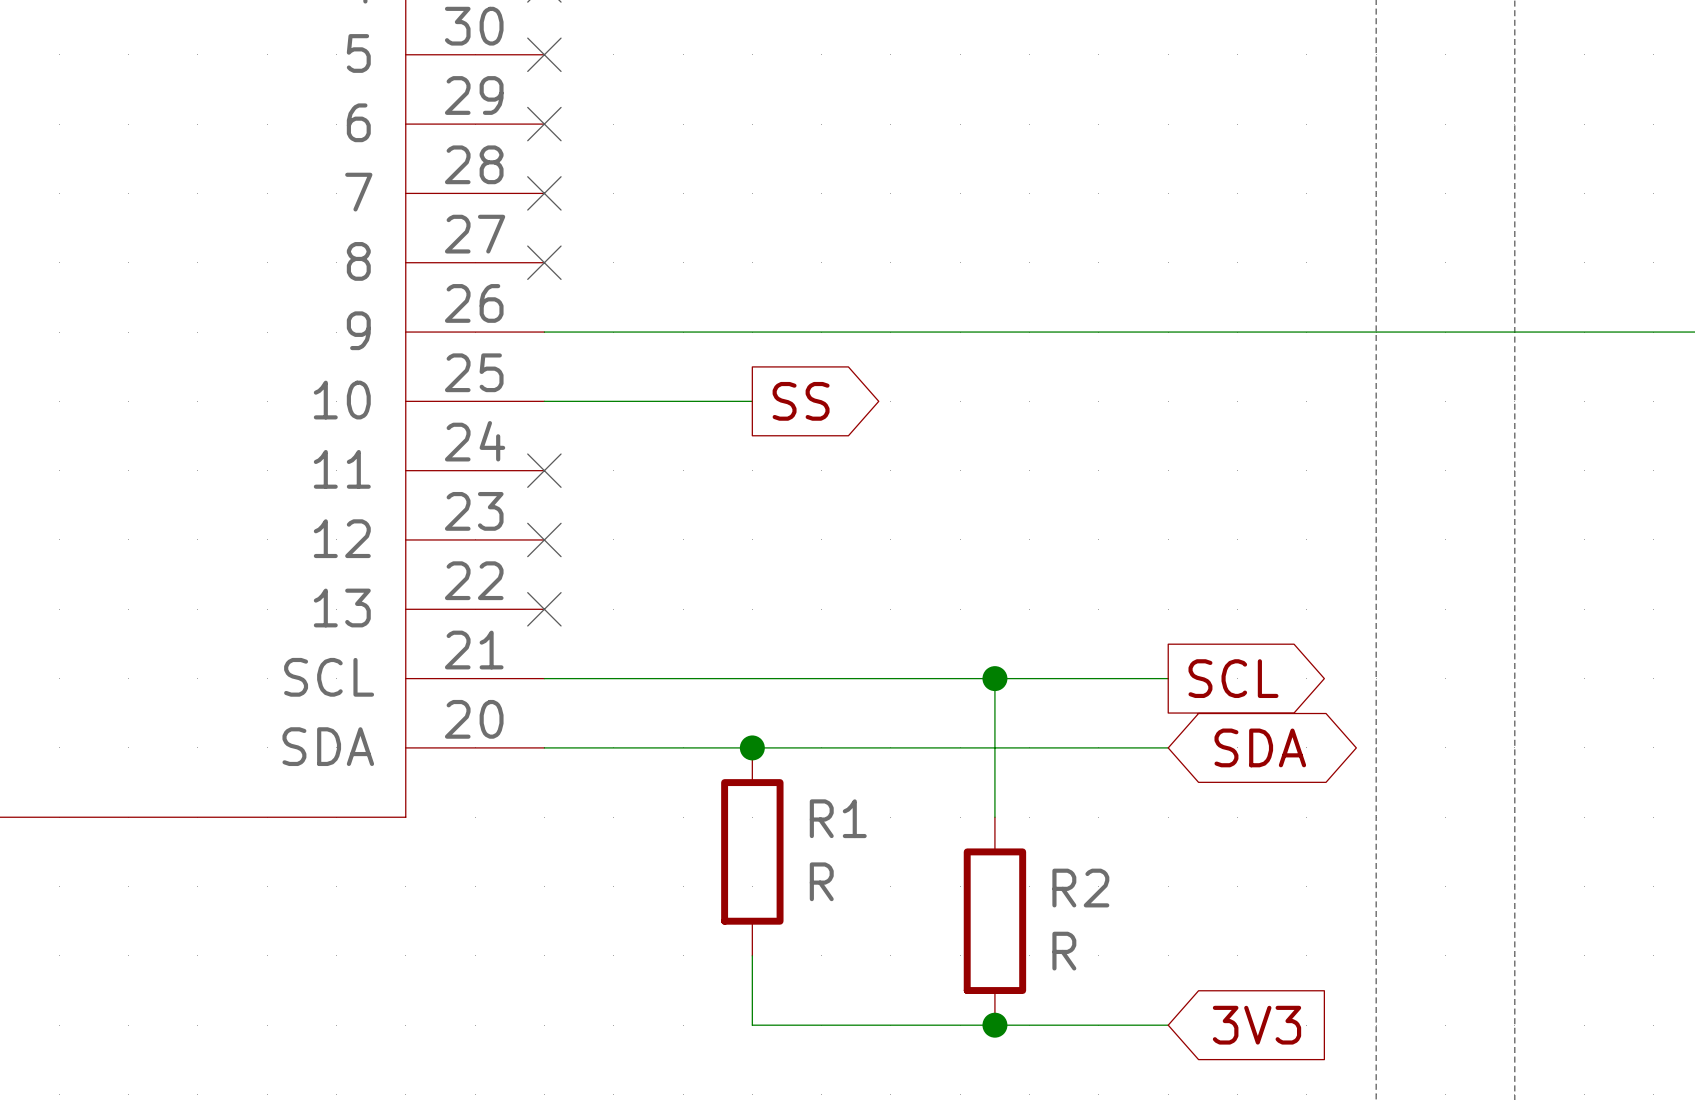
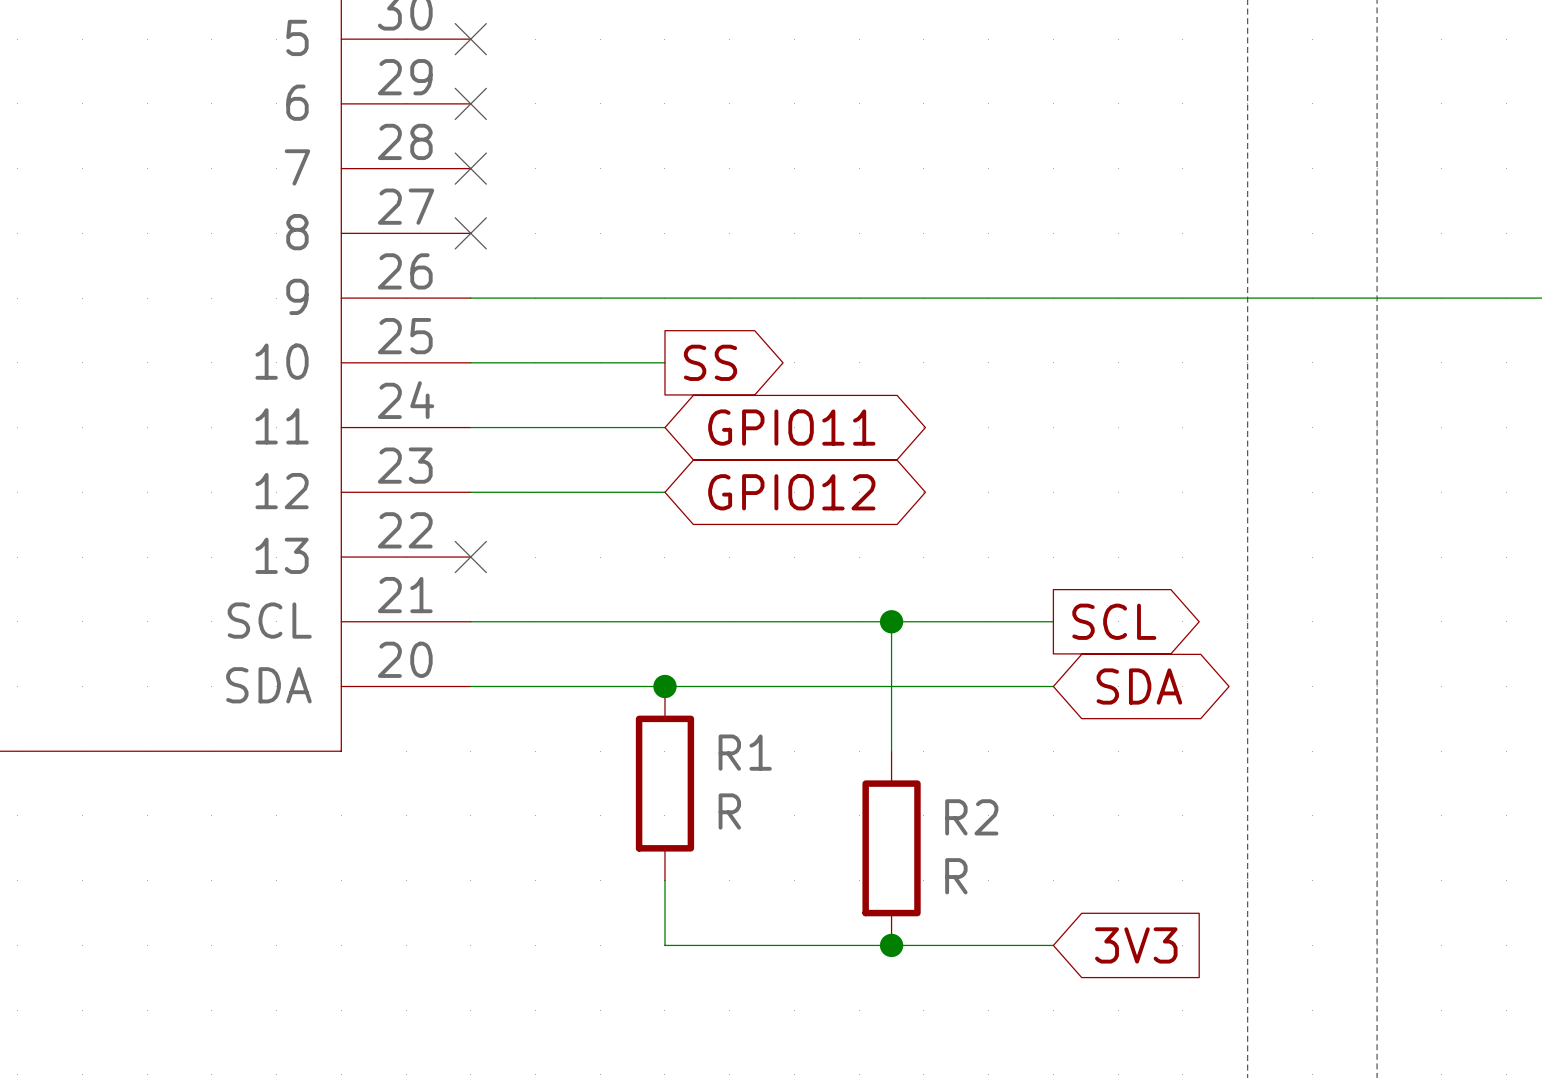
wire: none -> (470, 427) (664, 427)
no-connect mark: (544, 470) -> none
global label: none -> GPIO11 (791, 427)
wire: none -> (470, 492) (664, 492)
no-connect mark: (544, 539) -> none
global label: none -> GPIO12 (791, 492)

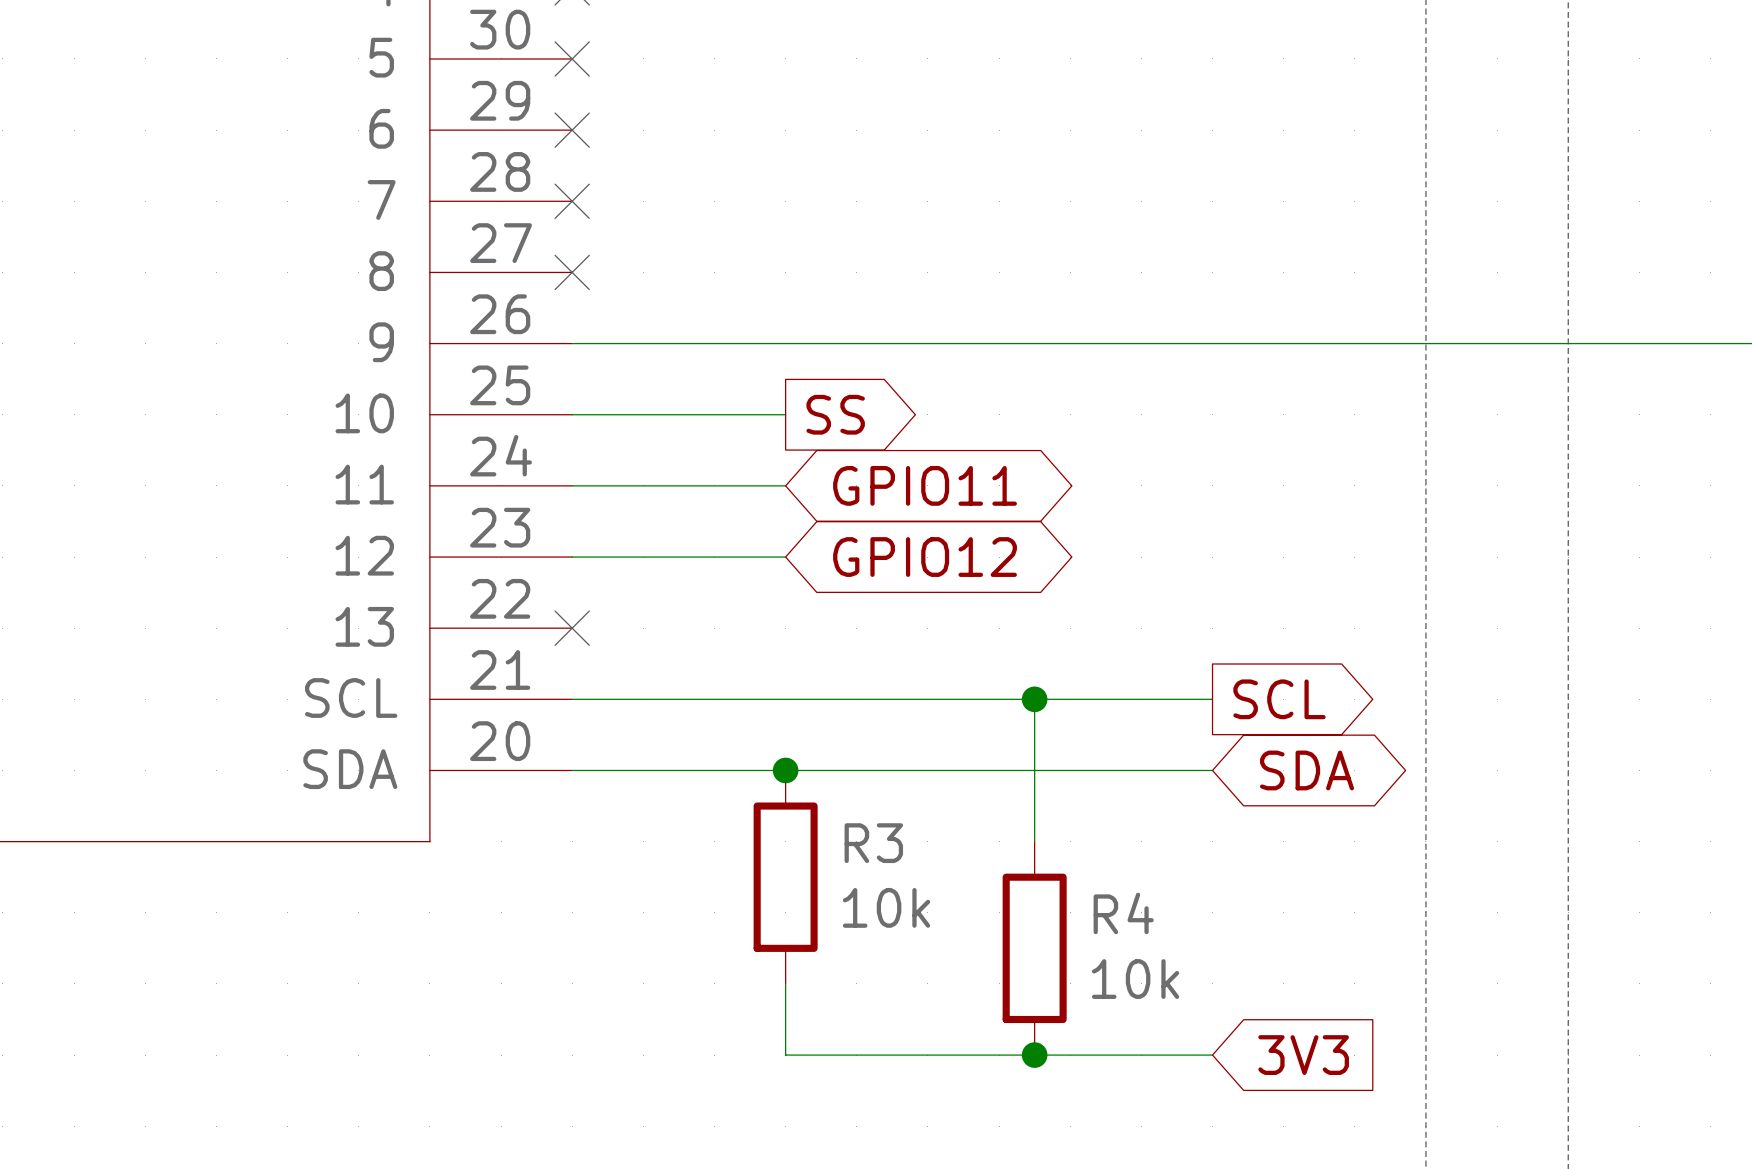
R1 name: R1 (745, 752) -> R3 (873, 843)
R1 value: R (729, 811) -> 10k (886, 907)
R2 name: R2 (971, 817) -> R4 (1123, 913)
R2 value: R (956, 876) -> 10k (1135, 979)

